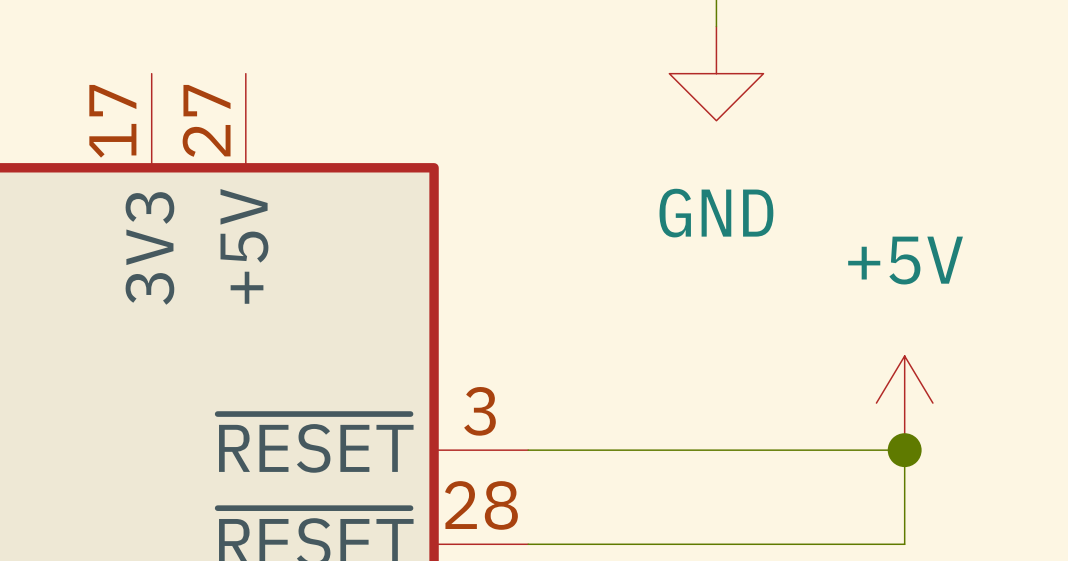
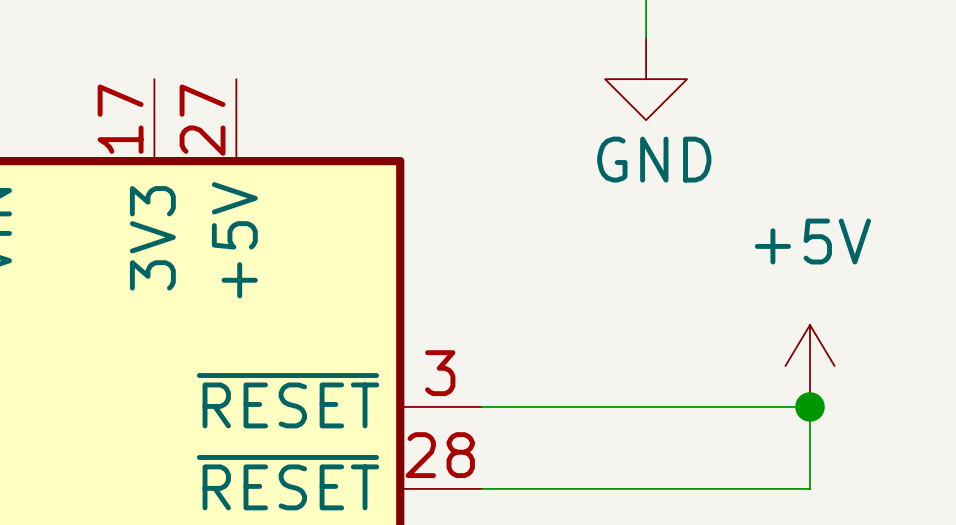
power symbol text position: GND (716, 213) -> GND (654, 159)

